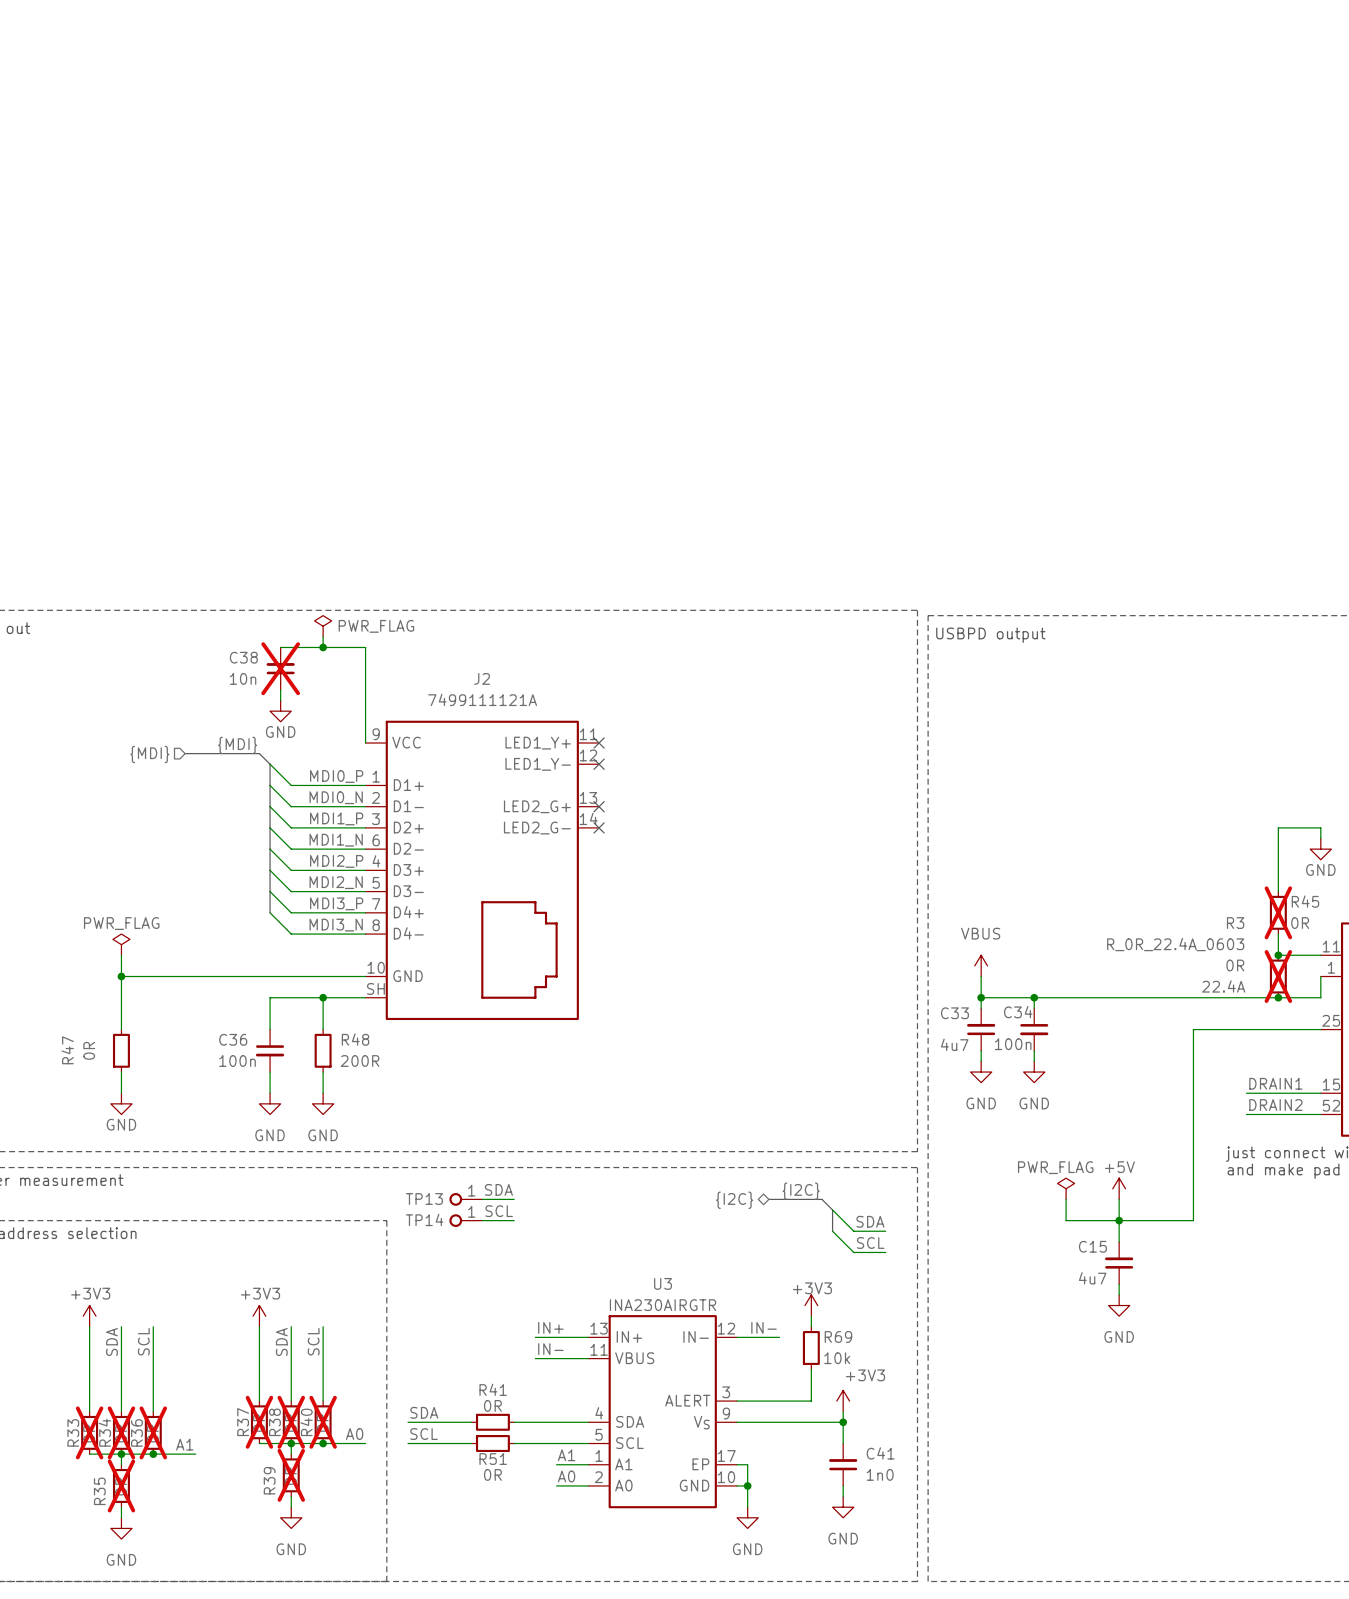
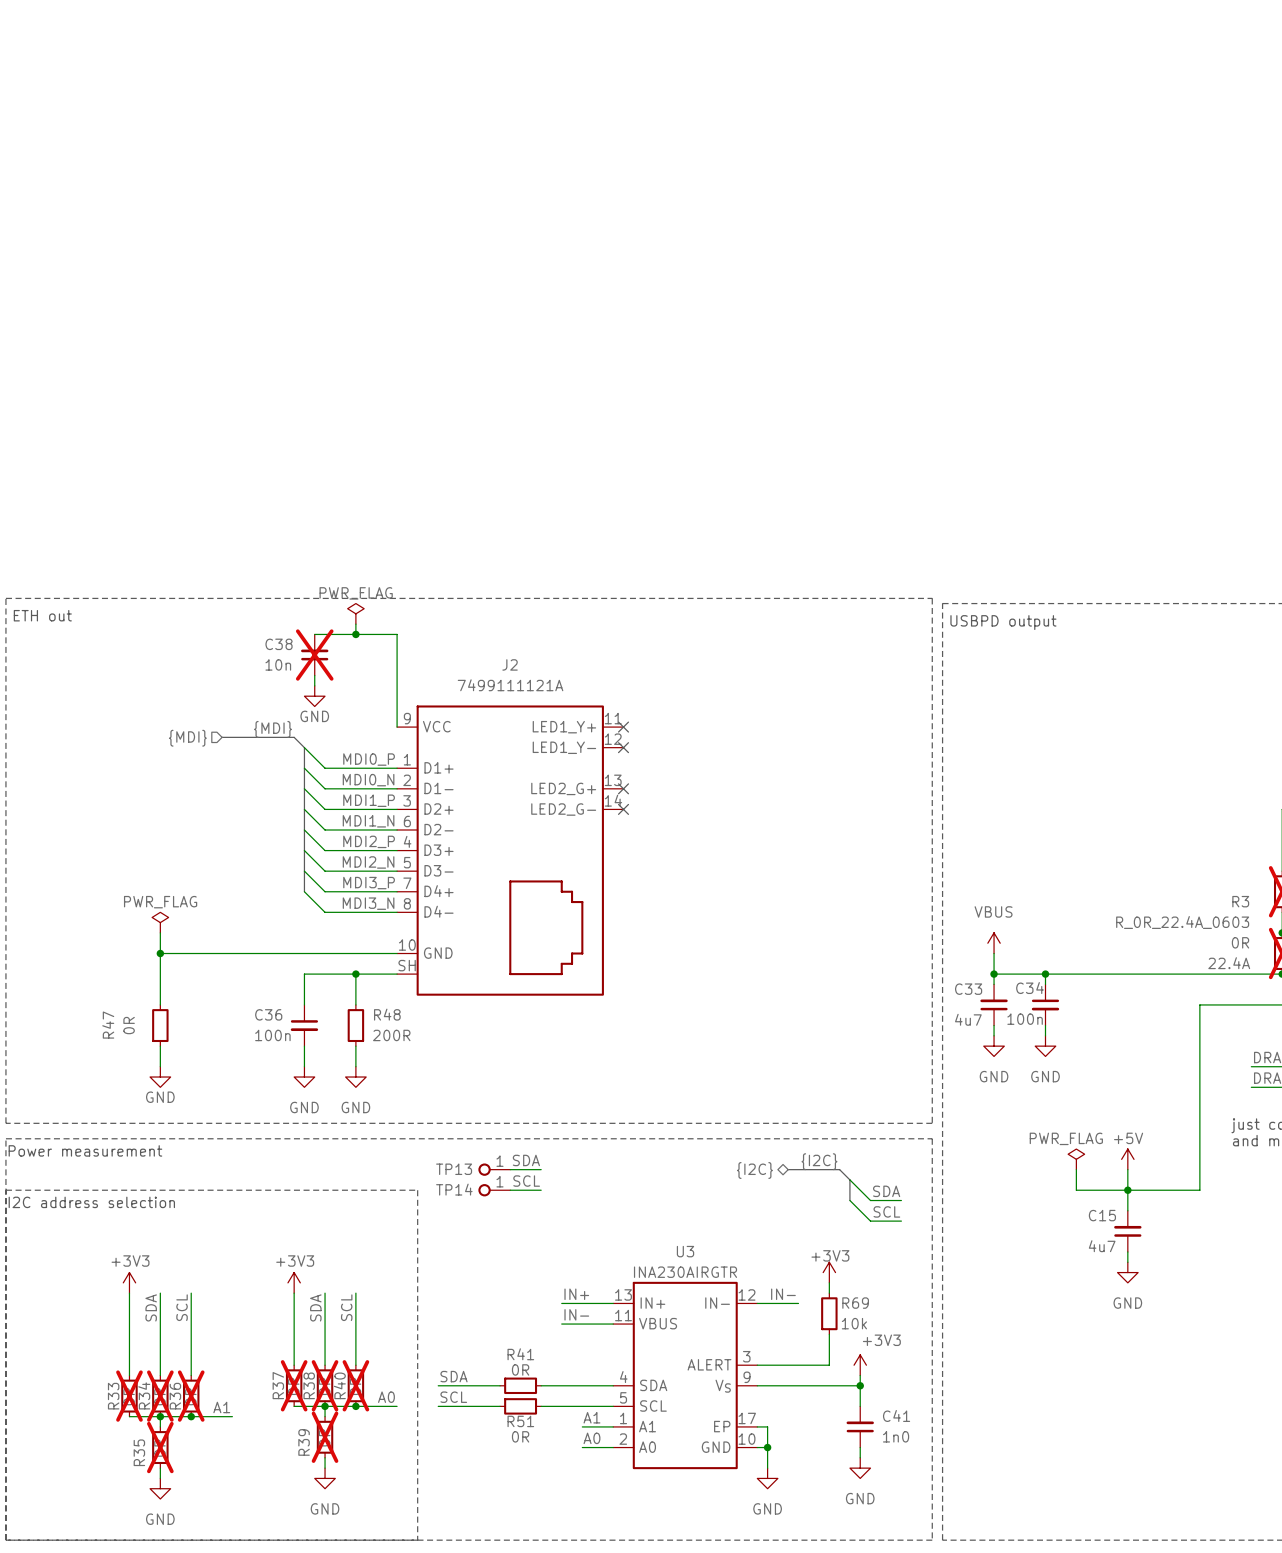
power symbol text position: PWR_FLAG (376, 626) -> PWR_FLAG (356, 593)

